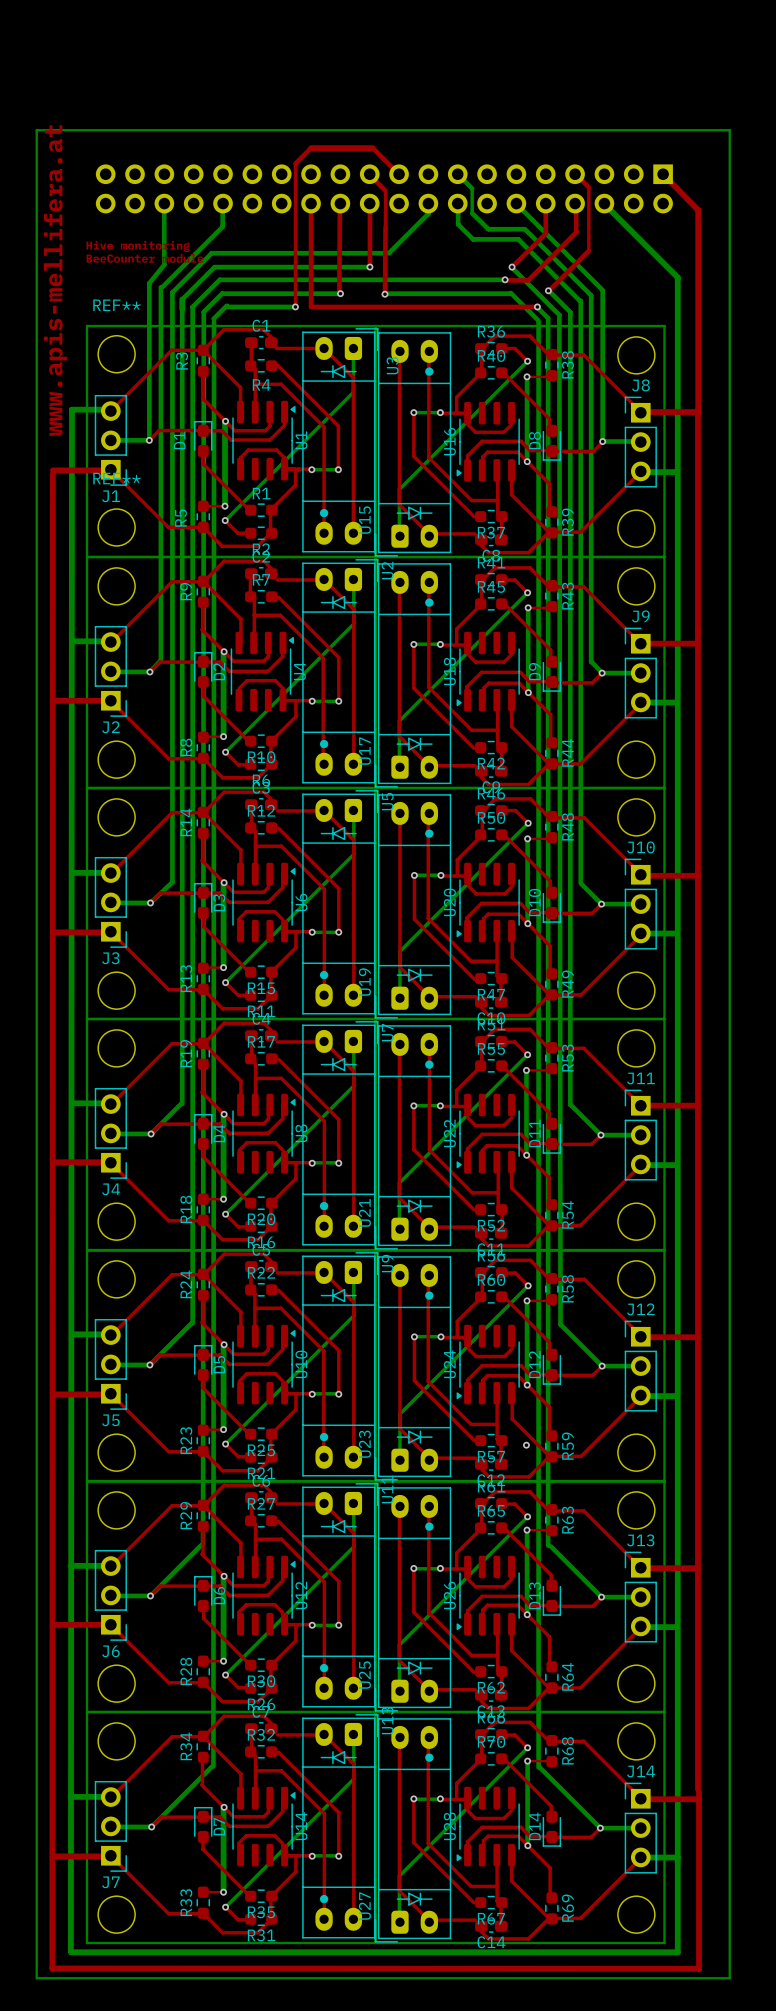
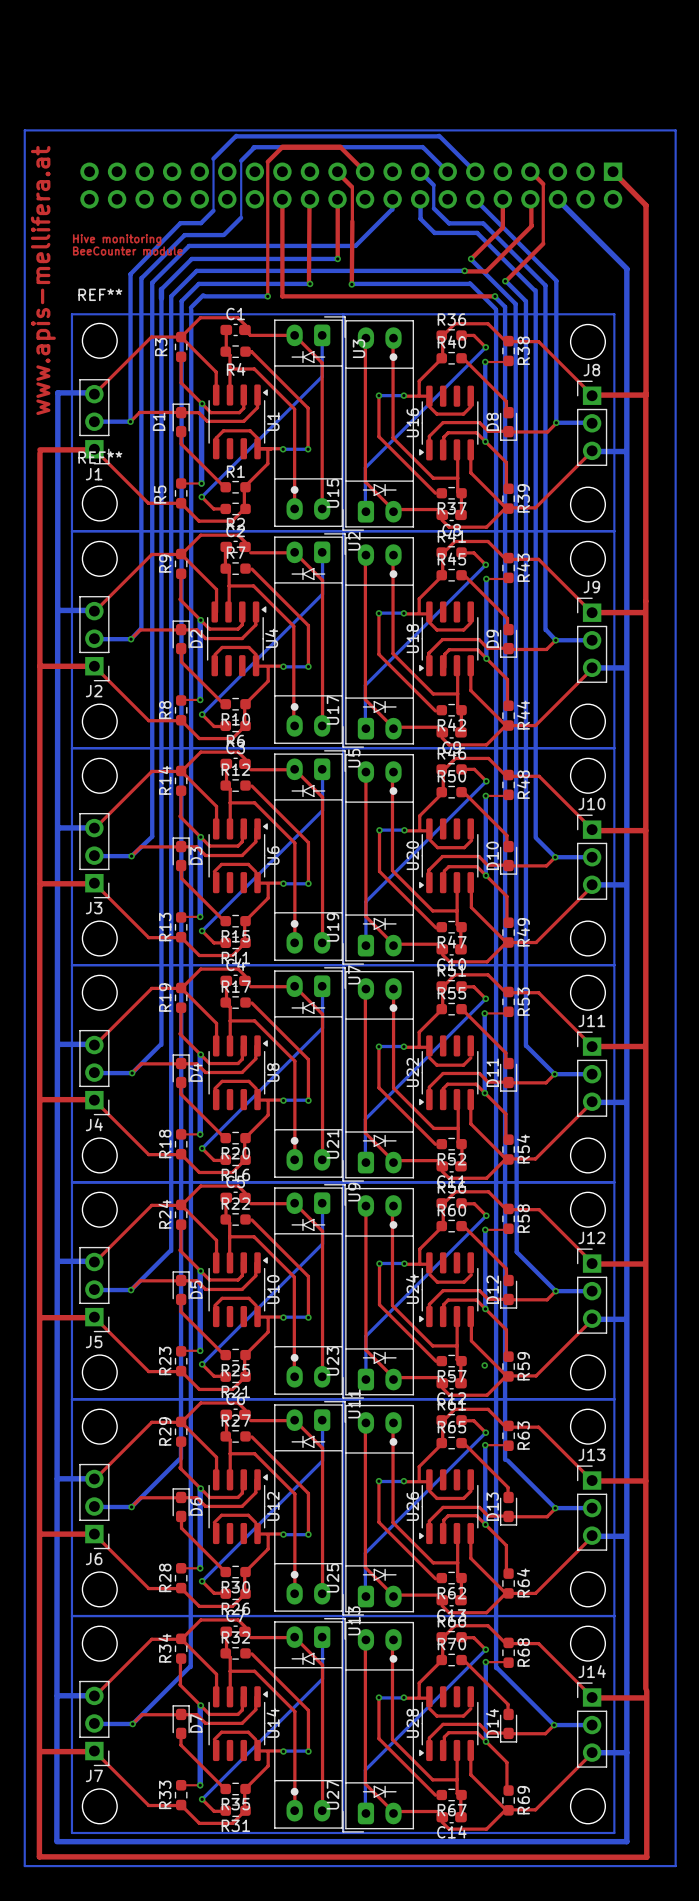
bottom track: none -> (236, 135) (213, 158)
bottom track: none -> (236, 136) (438, 136)
bottom track: none -> (439, 135) (475, 172)
bottom track: none -> (422, 146) (447, 172)
bottom track: none -> (253, 147) (422, 147)
bottom track: none -> (254, 147) (241, 160) (241, 218)
bottom track: (222, 203) (222, 226) (161, 287) -> none
bottom track: (164, 204) (164, 264) -> none
bottom track: none -> (241, 217) (223, 234)
bottom track: none -> (223, 235) (184, 235) (141, 277)
bottom track: (164, 264) (149, 283) -> (213, 158) (213, 210) (201, 223) (180, 223) (130, 274)

